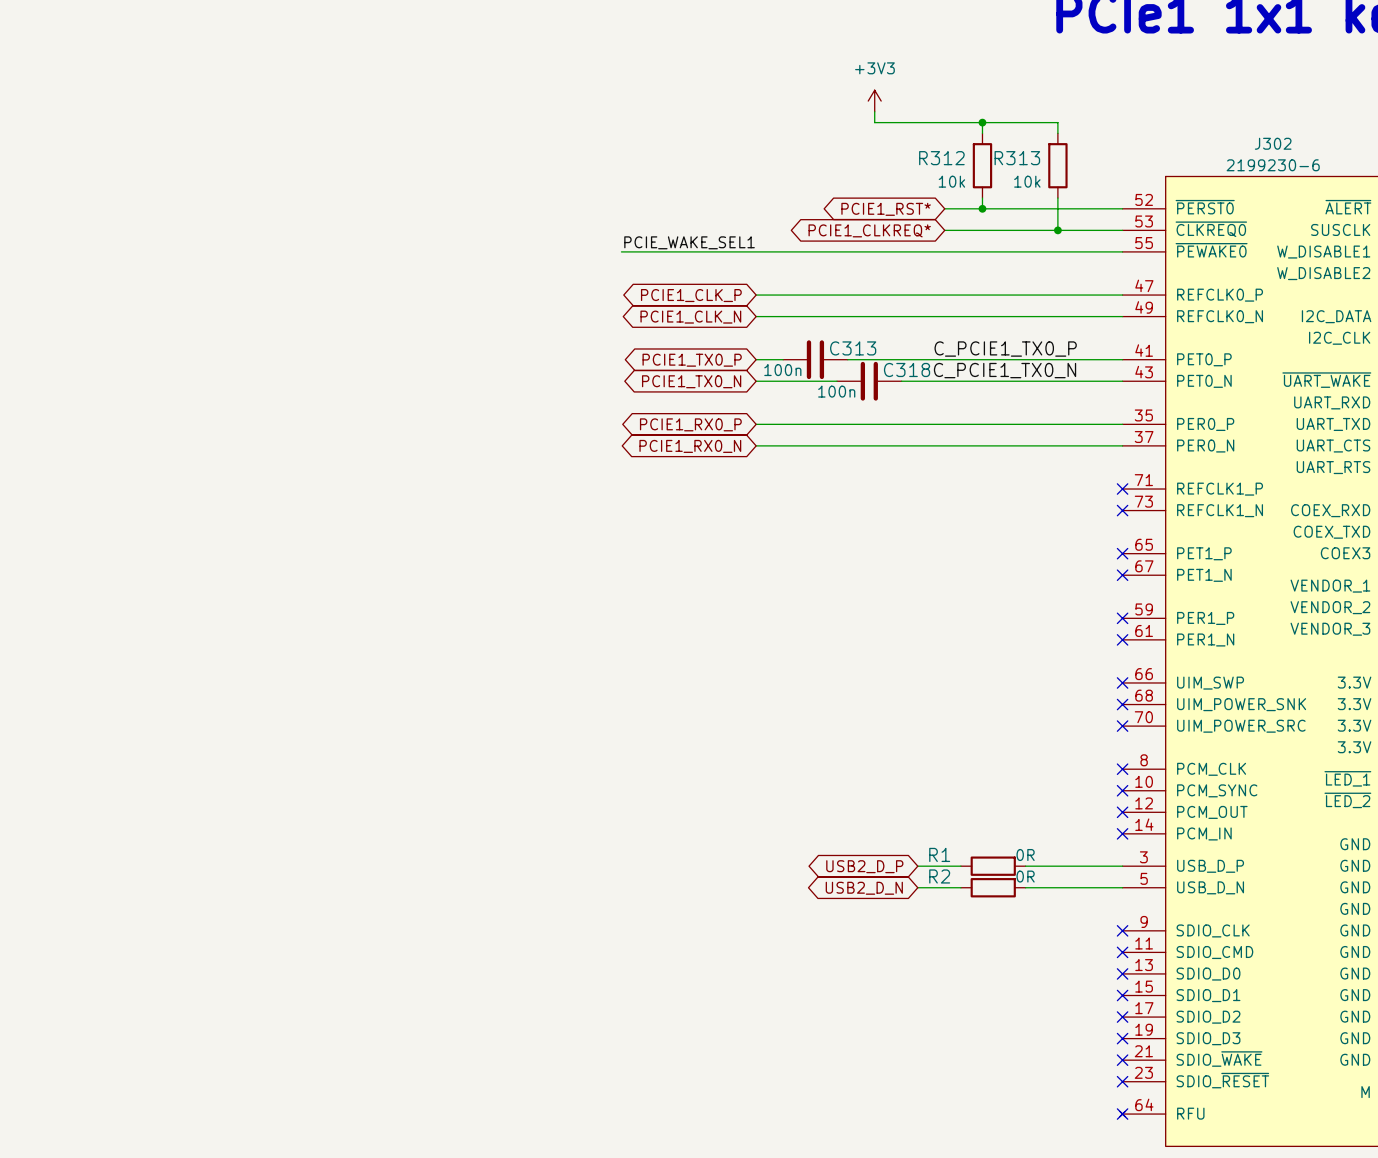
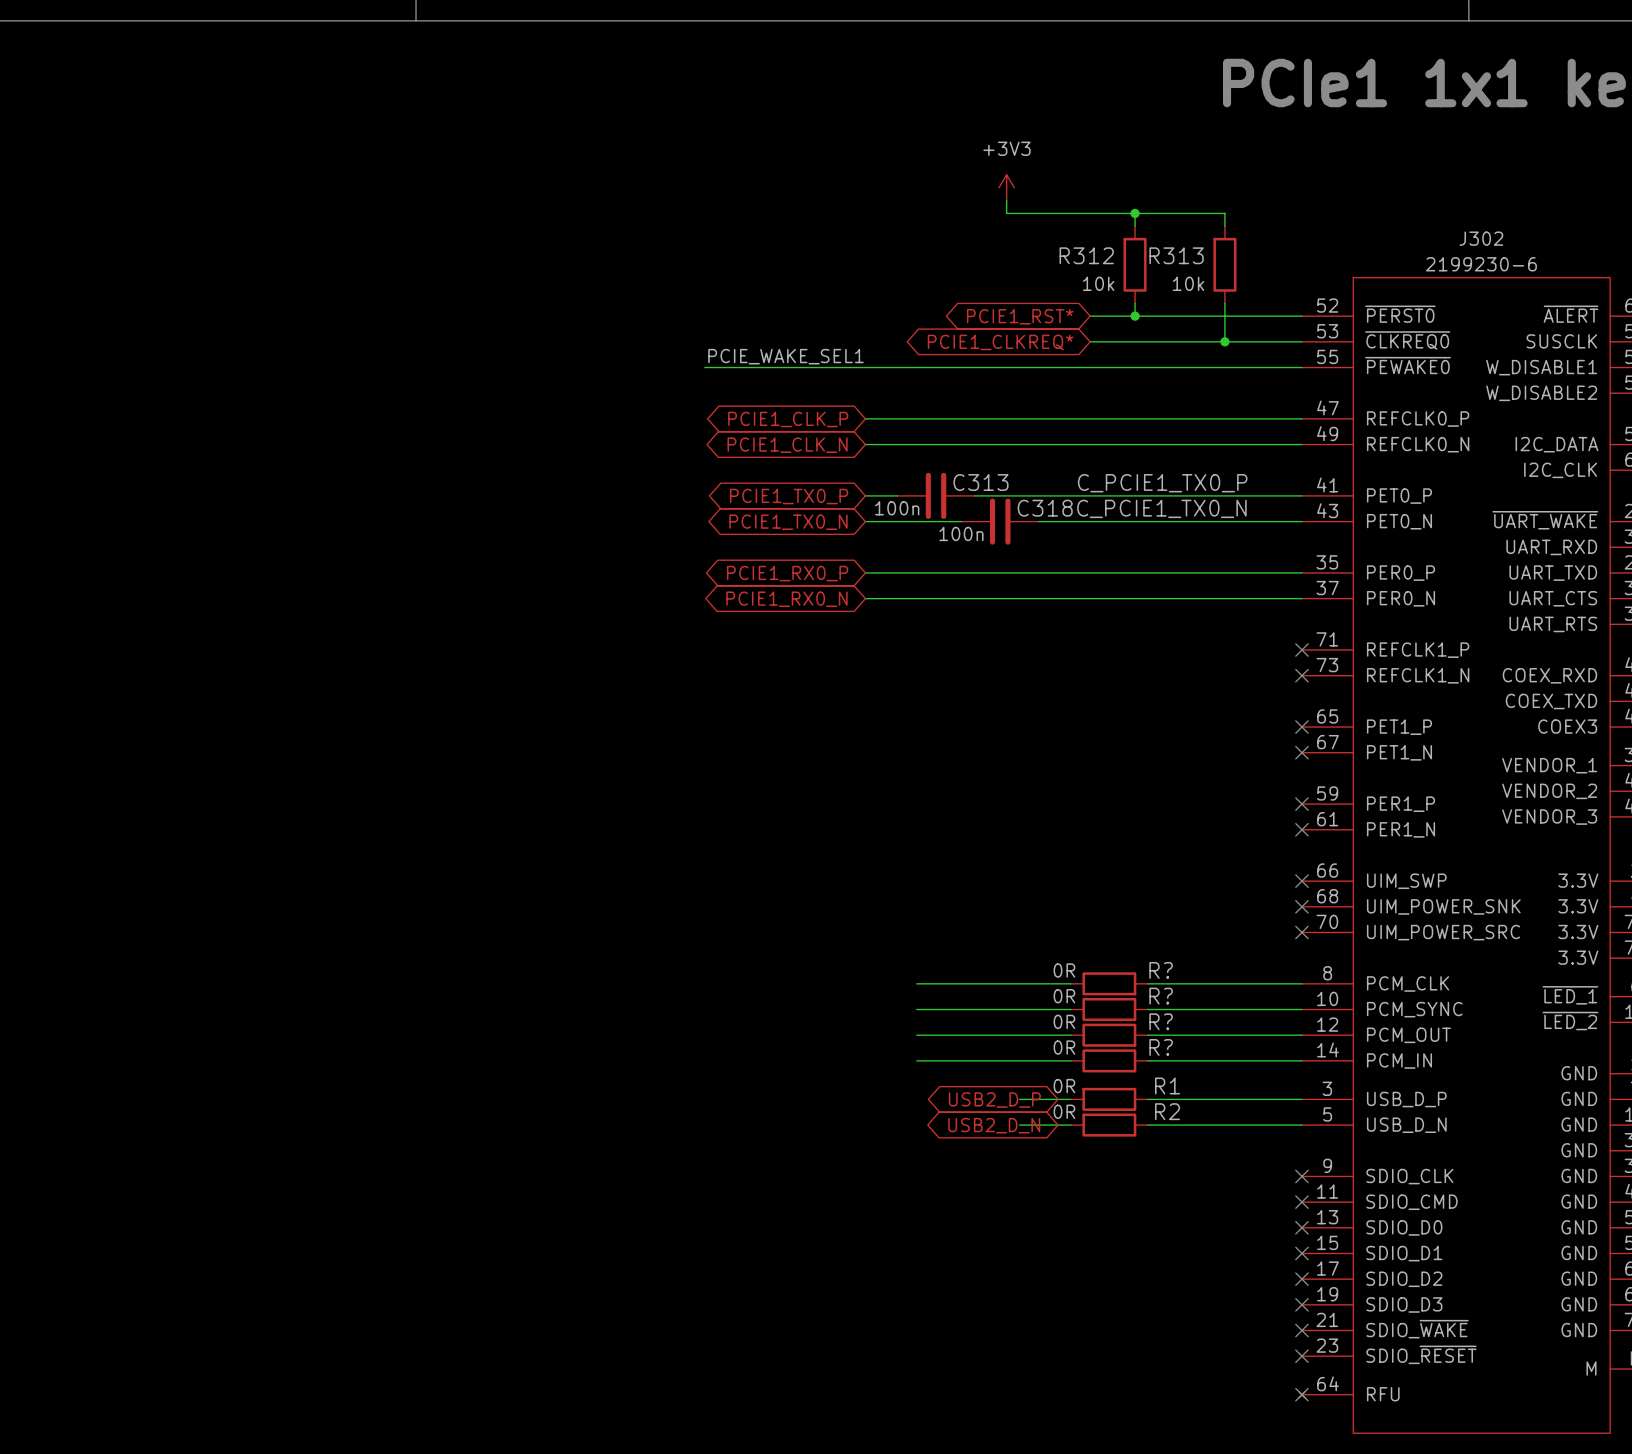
wire: none -> (916, 983) (1070, 983)
R?: none -> (1109, 983)
wire: none -> (1147, 983) (1301, 983)
no-connect mark: (1122, 769) -> none
wire: none -> (916, 1009) (1070, 1009)
R?: none -> (1109, 1009)
wire: none -> (1147, 1009) (1301, 1009)
no-connect mark: (1122, 790) -> none
wire: none -> (916, 1035) (1070, 1035)
R?: none -> (1109, 1035)
wire: none -> (1147, 1035) (1301, 1035)
no-connect mark: (1122, 812) -> none
wire: none -> (916, 1060) (1070, 1060)
R?: none -> (1109, 1060)
wire: none -> (1147, 1060) (1301, 1060)
no-connect mark: (1122, 833) -> none
R1 name position: R1 (939, 854) -> R1 (1167, 1085)
R1 text position: 0R (1025, 855) -> 0R (1064, 1086)
wire: (928, 866) (960, 866) -> (1019, 1099) (1058, 1099)
wire: none -> (1147, 1099) (1186, 1099)
R1 position: (993, 866) -> (1109, 1099)
R2 name position: R2 (939, 876) -> R2 (1167, 1111)
R2 text position: 0R (1025, 876) -> 0R (1064, 1111)
wire: (928, 887) (960, 887) -> (1019, 1125) (1058, 1125)
wire: none -> (1147, 1125) (1186, 1125)
R2 position: (993, 887) -> (1109, 1125)

